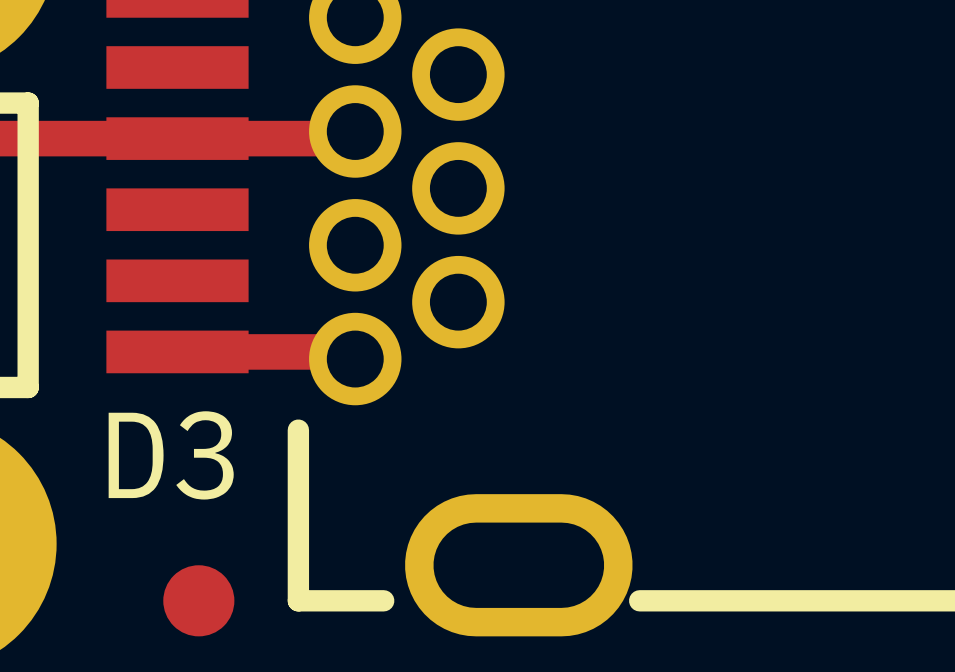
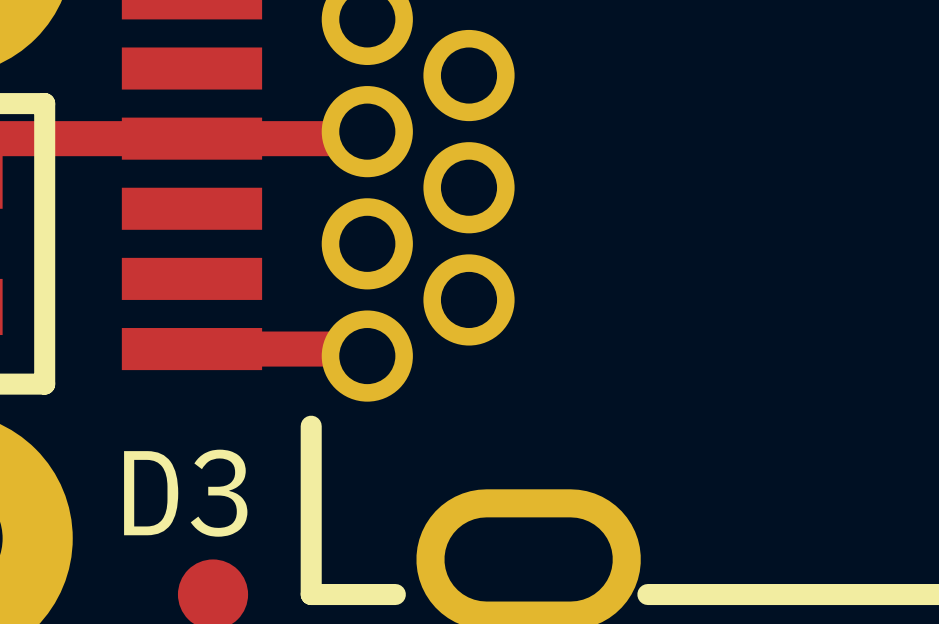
D3 name position: D3 (171, 455) -> D3 (185, 493)

